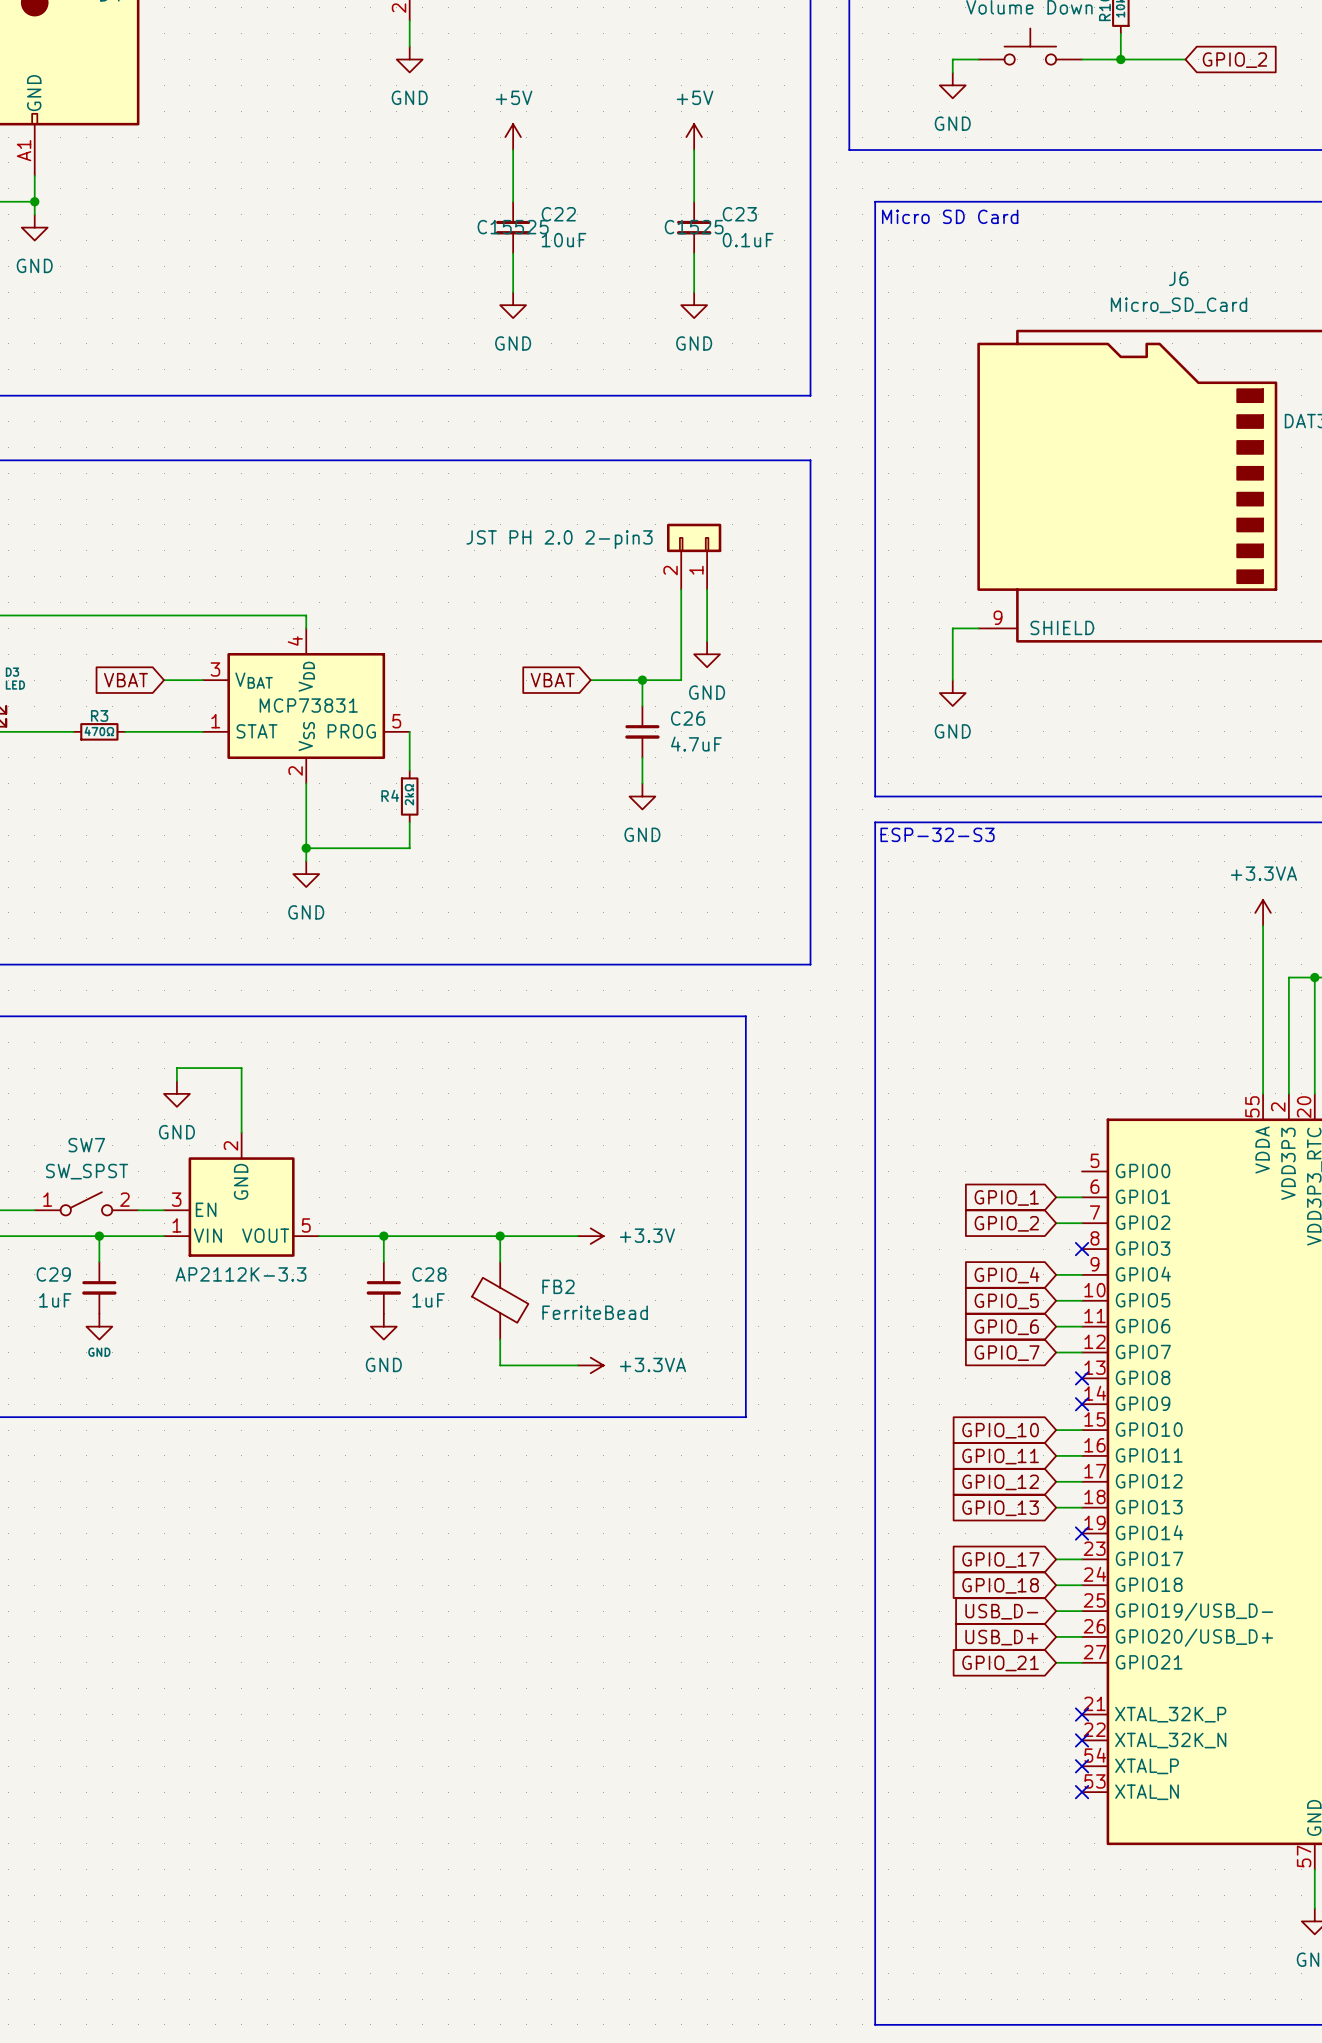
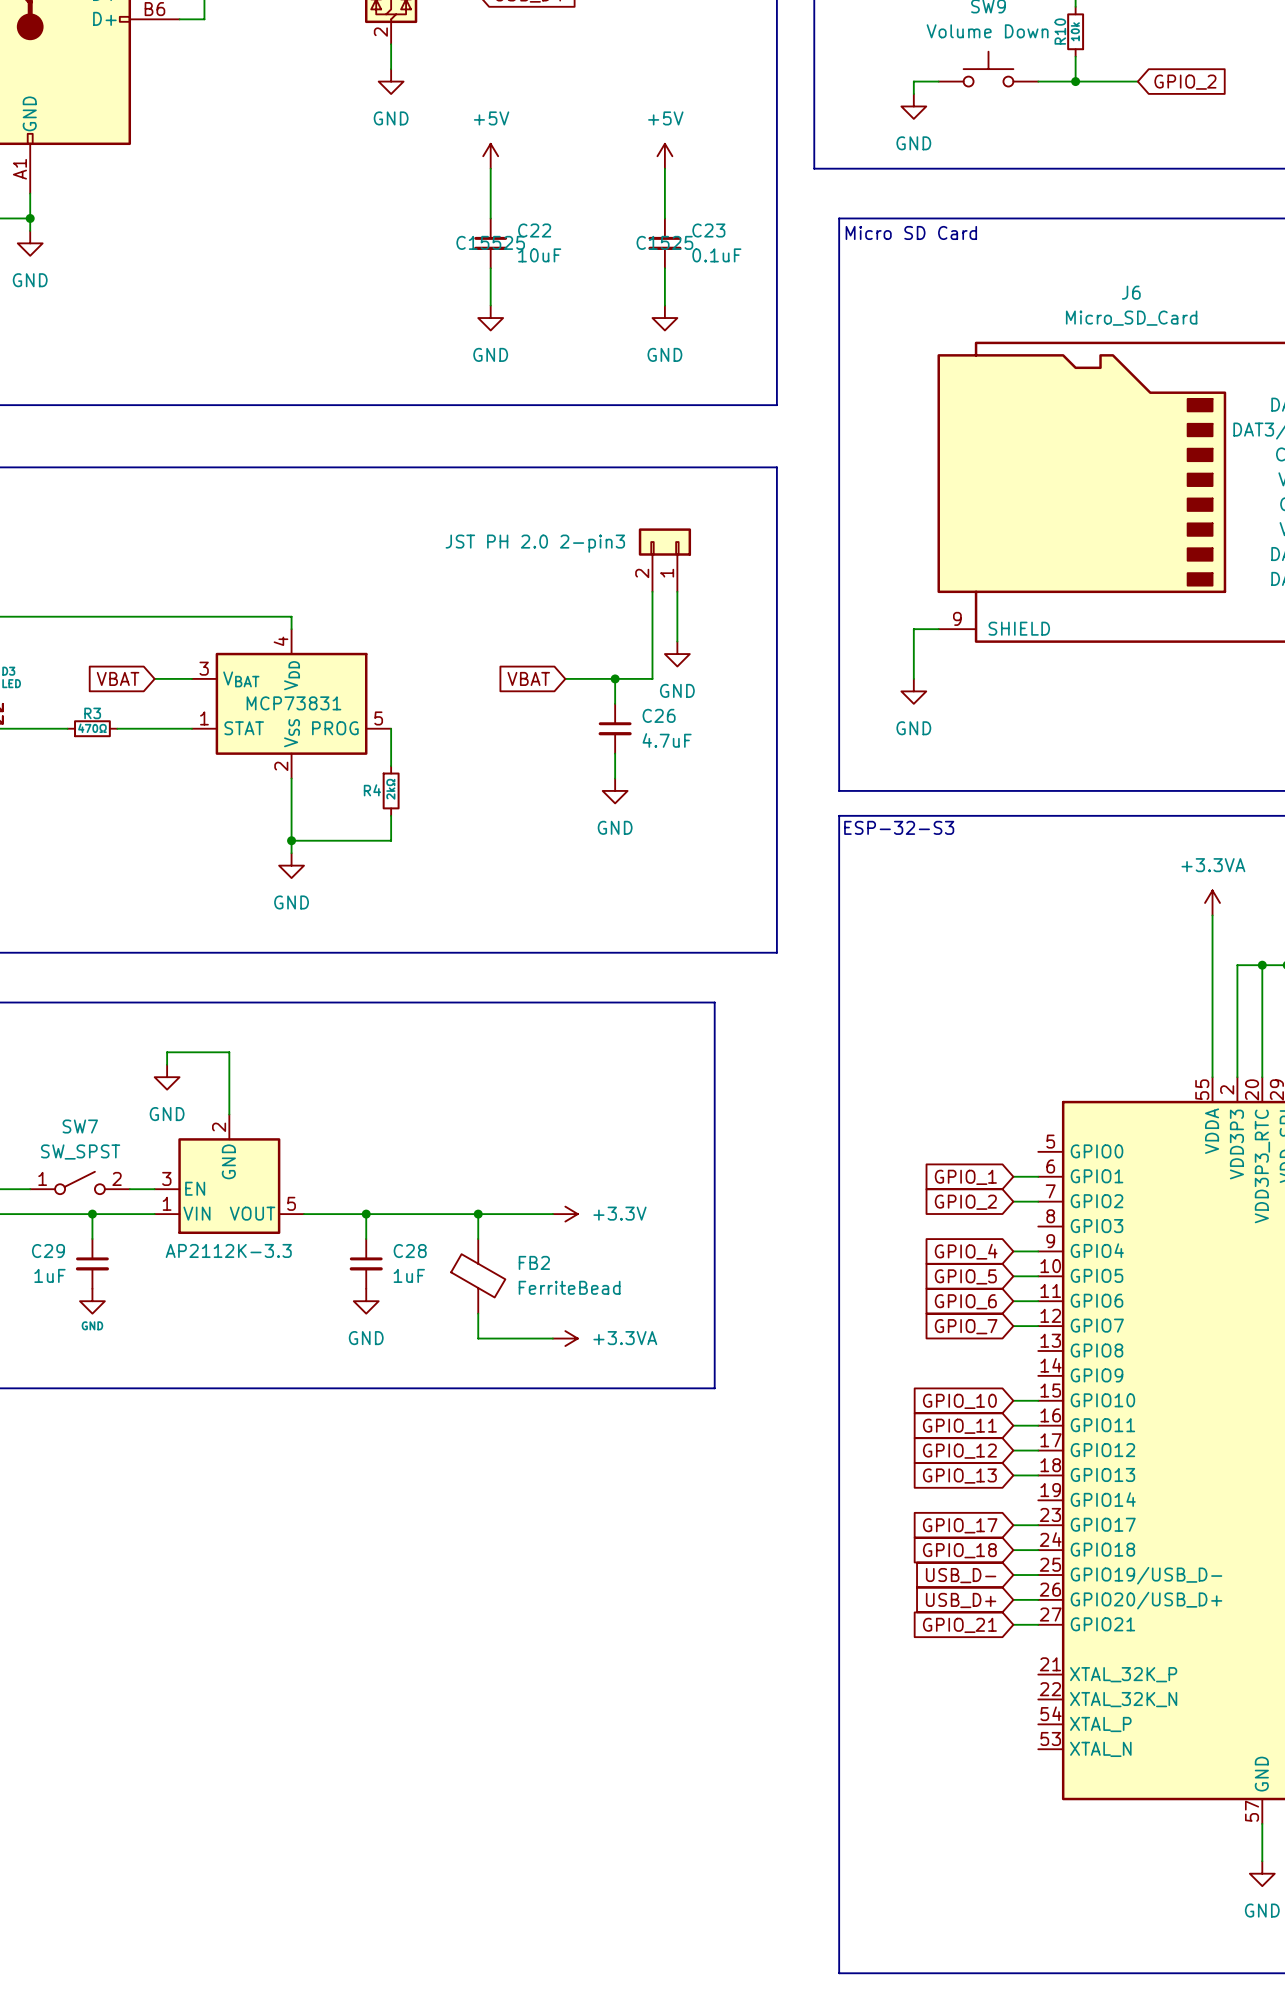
no-connect mark: (1082, 1249) -> none
no-connect mark: (1082, 1378) -> none
no-connect mark: (1082, 1404) -> none
no-connect mark: (1082, 1533) -> none
no-connect mark: (1082, 1714) -> none
no-connect mark: (1082, 1740) -> none
no-connect mark: (1082, 1766) -> none
no-connect mark: (1082, 1792) -> none

